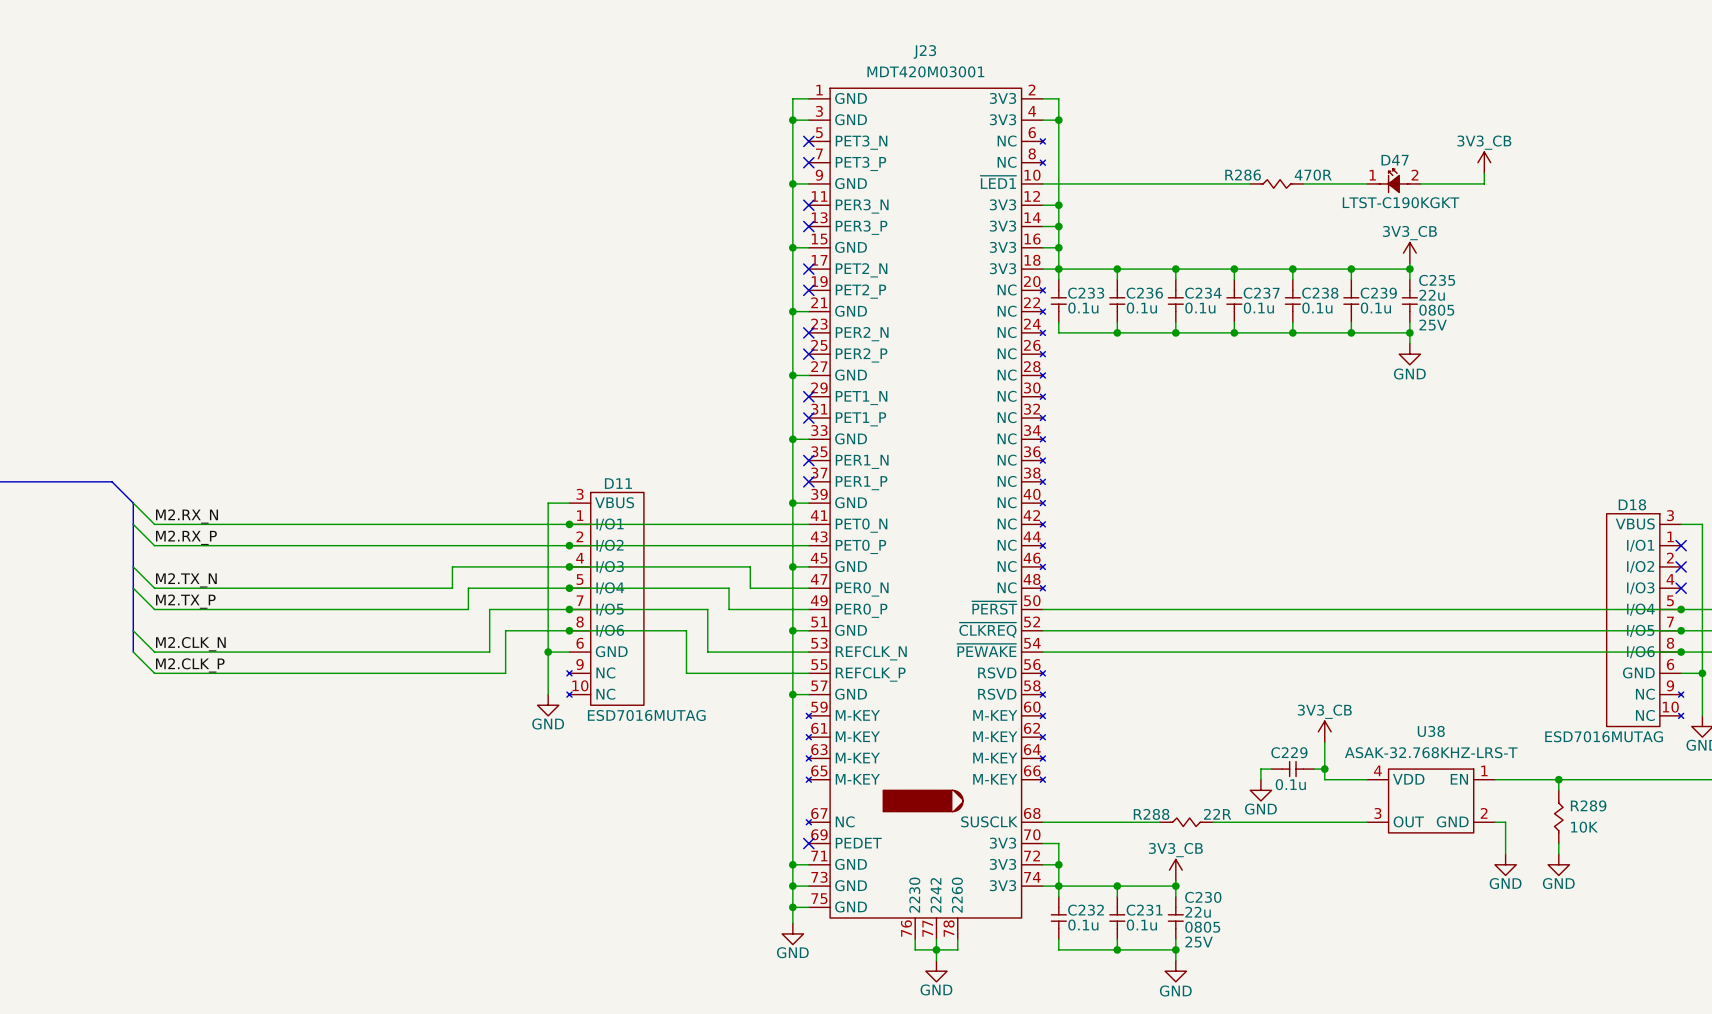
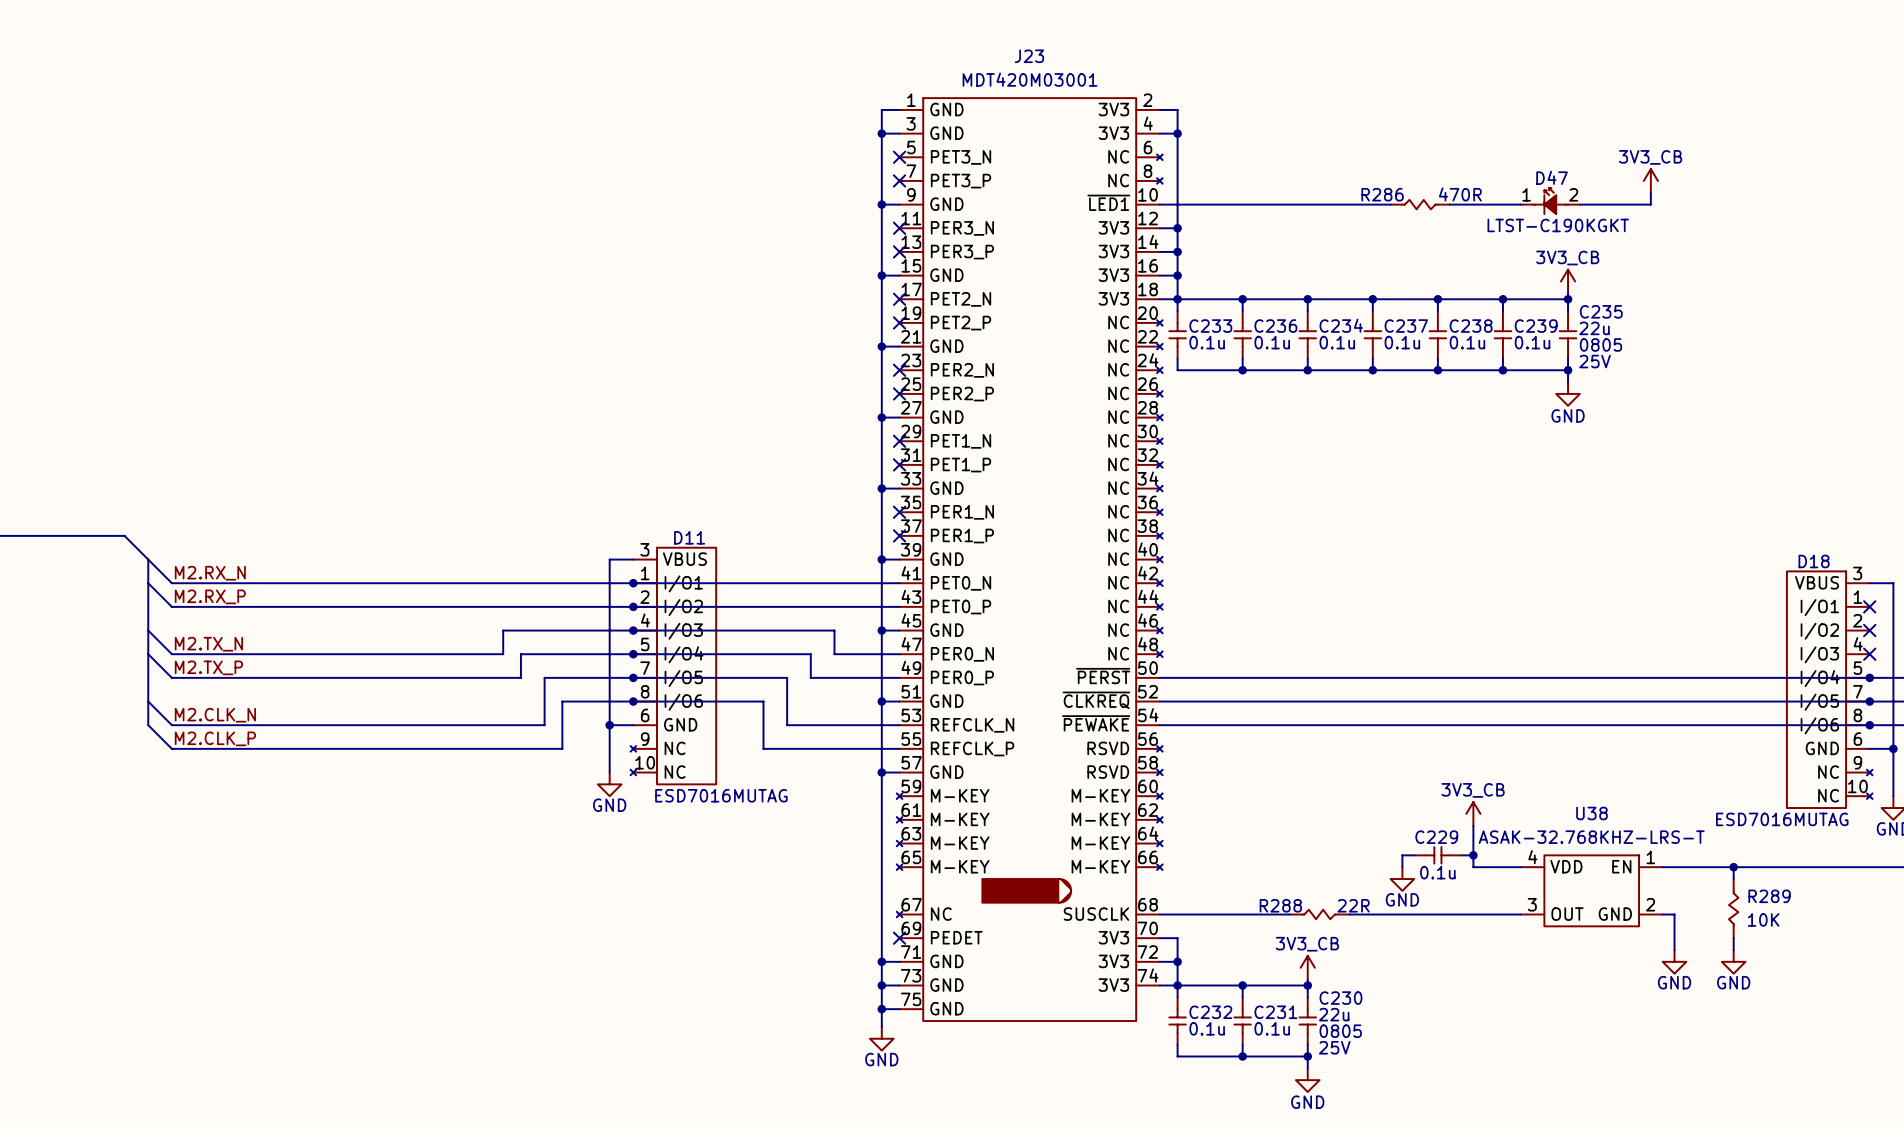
J23 symbol: [806, 88, 1046, 940] -> [896, 98, 1163, 1021]
wire: (915, 939) (915, 949) (957, 949) (957, 939) -> none
wire: (936, 939) (936, 960) -> none
junction: (936, 949) -> none
power symbol: GND (936, 971) -> none

